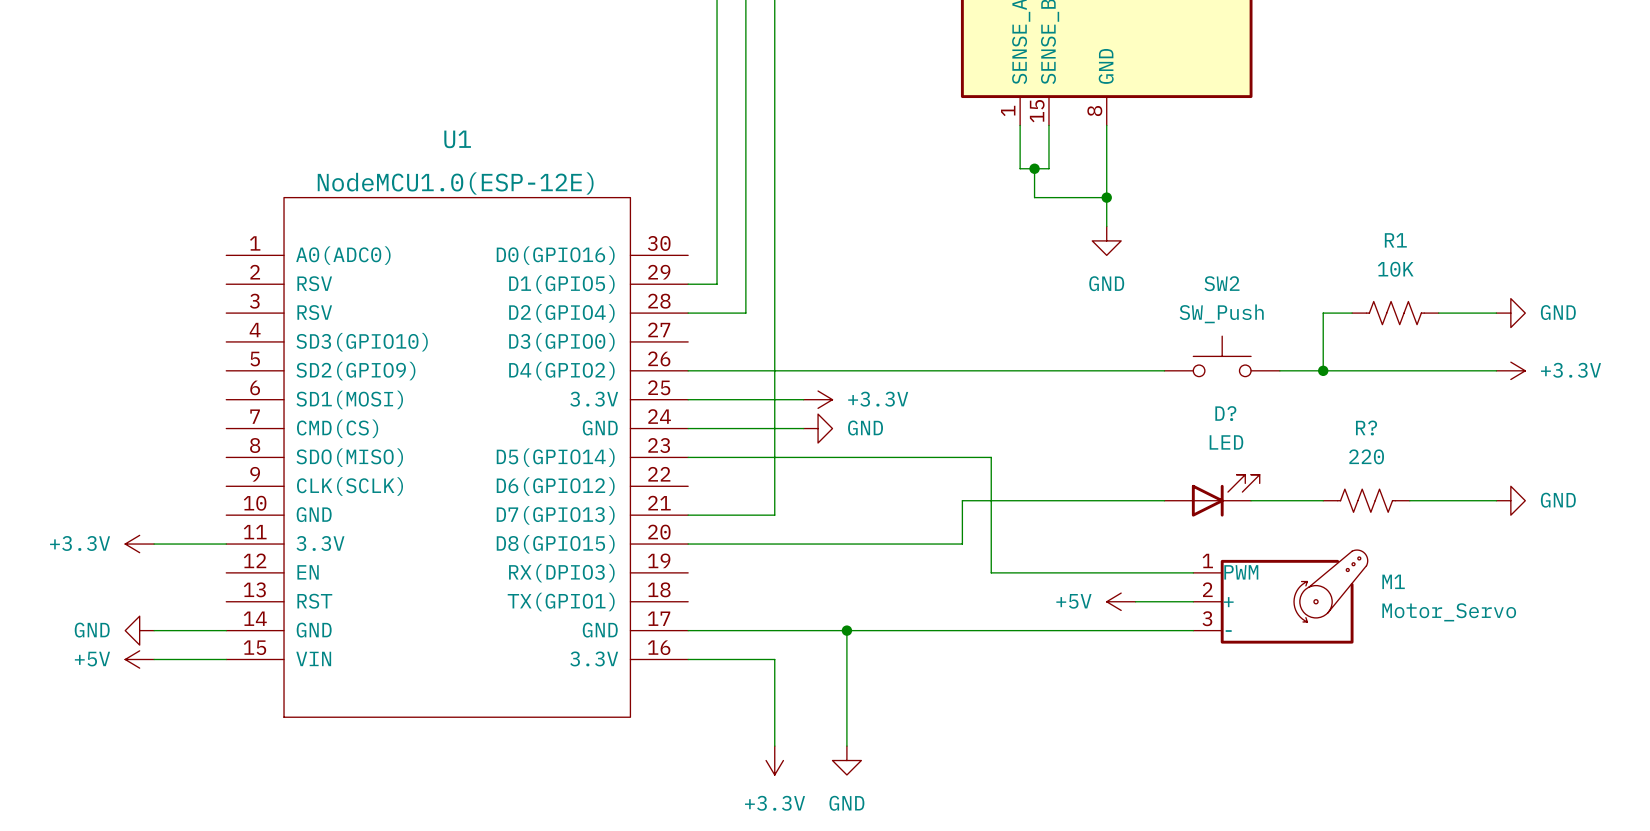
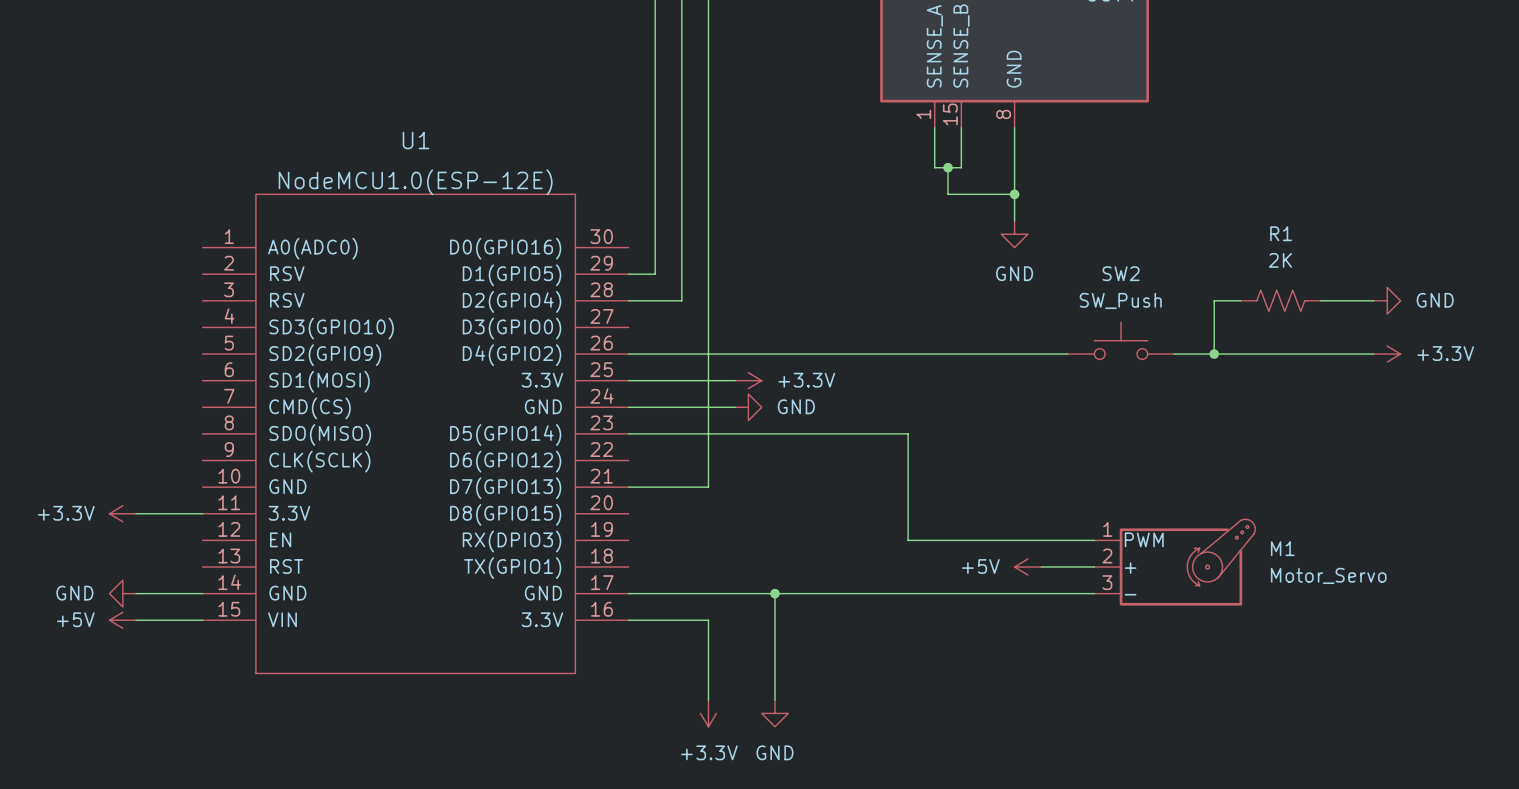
R1 value: 10K (1395, 269) -> 2K (1280, 260)
D?: LED (1212, 495) -> none
wire: (1164, 500) (962, 500) (962, 544) (688, 544) -> none
wire: (1251, 500) (1323, 500) -> none
R?: 220 (1366, 500) -> none
wire: (1409, 500) (1496, 500) -> none
power symbol: GND (1510, 500) -> none

